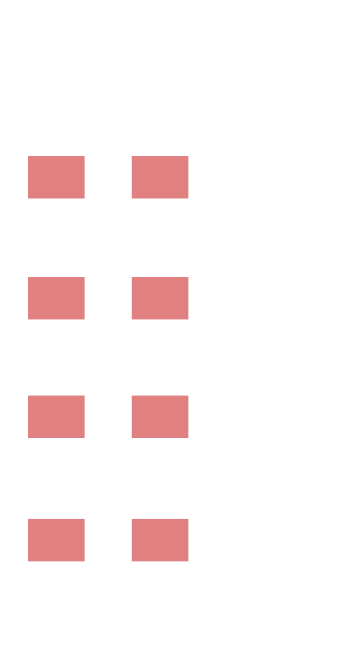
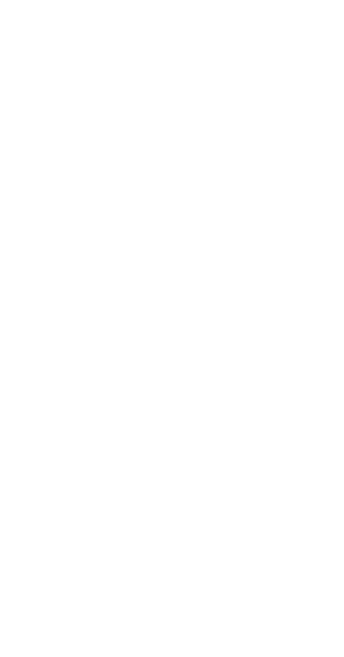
part: (108, 177) -> none
part: (108, 298) -> none
part: (108, 416) -> none
part: (108, 540) -> none

